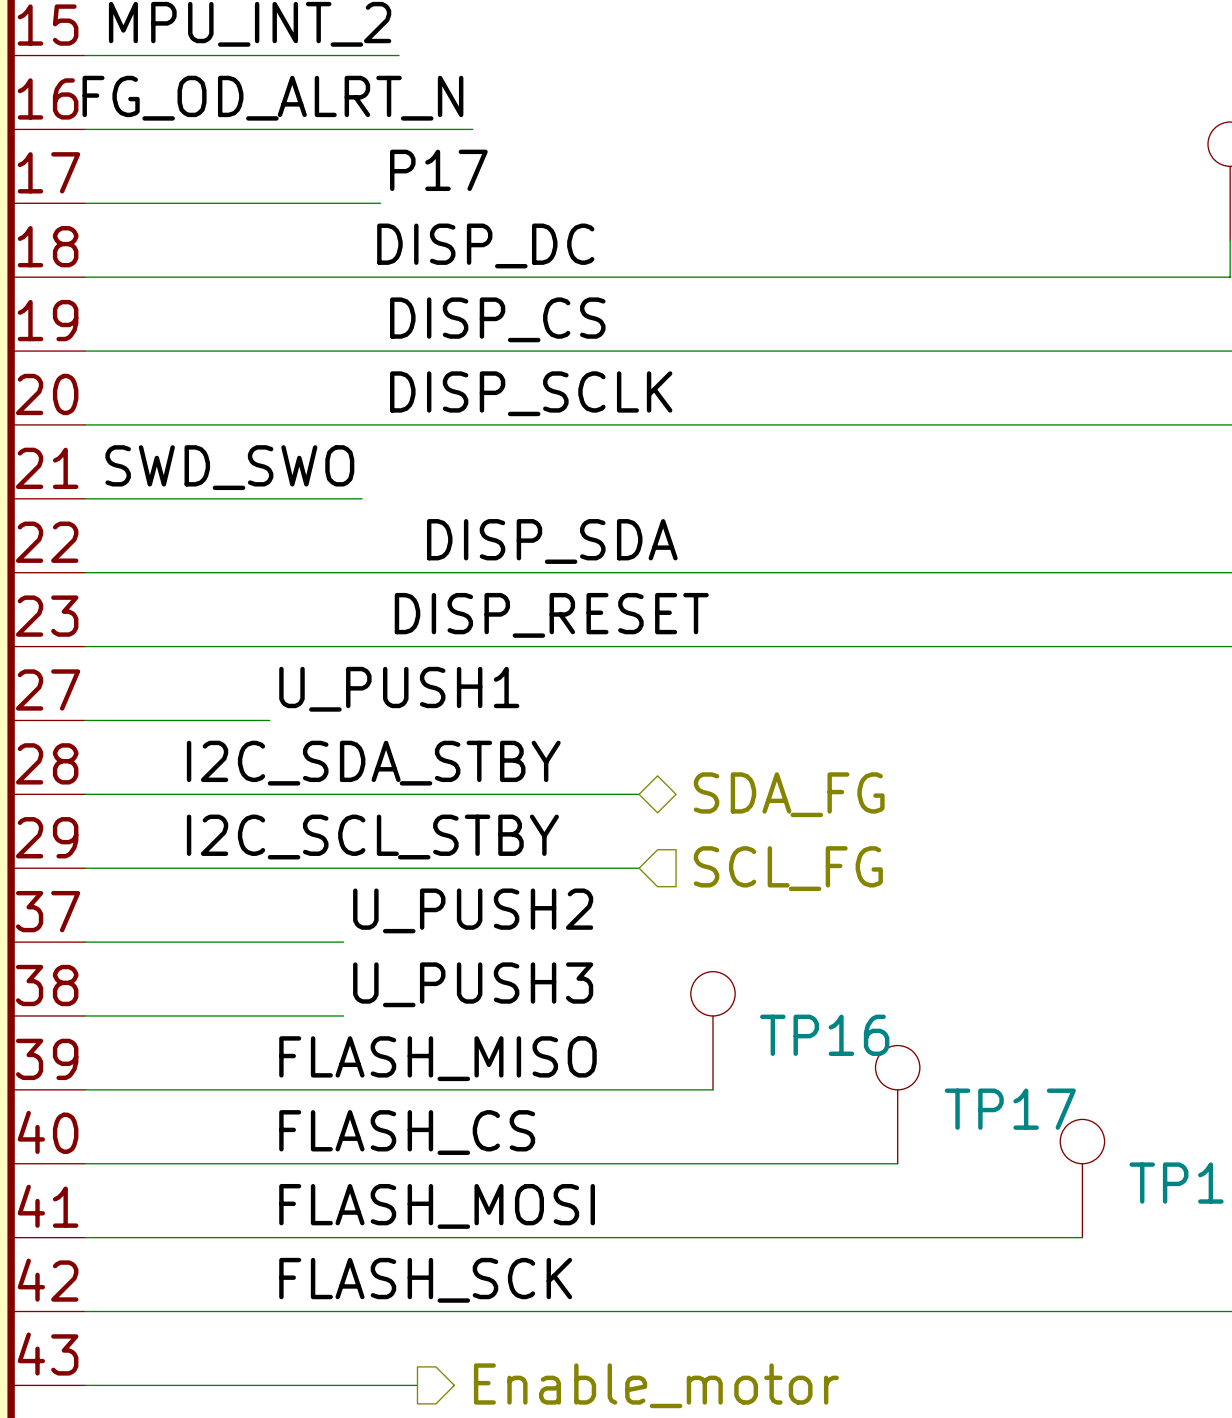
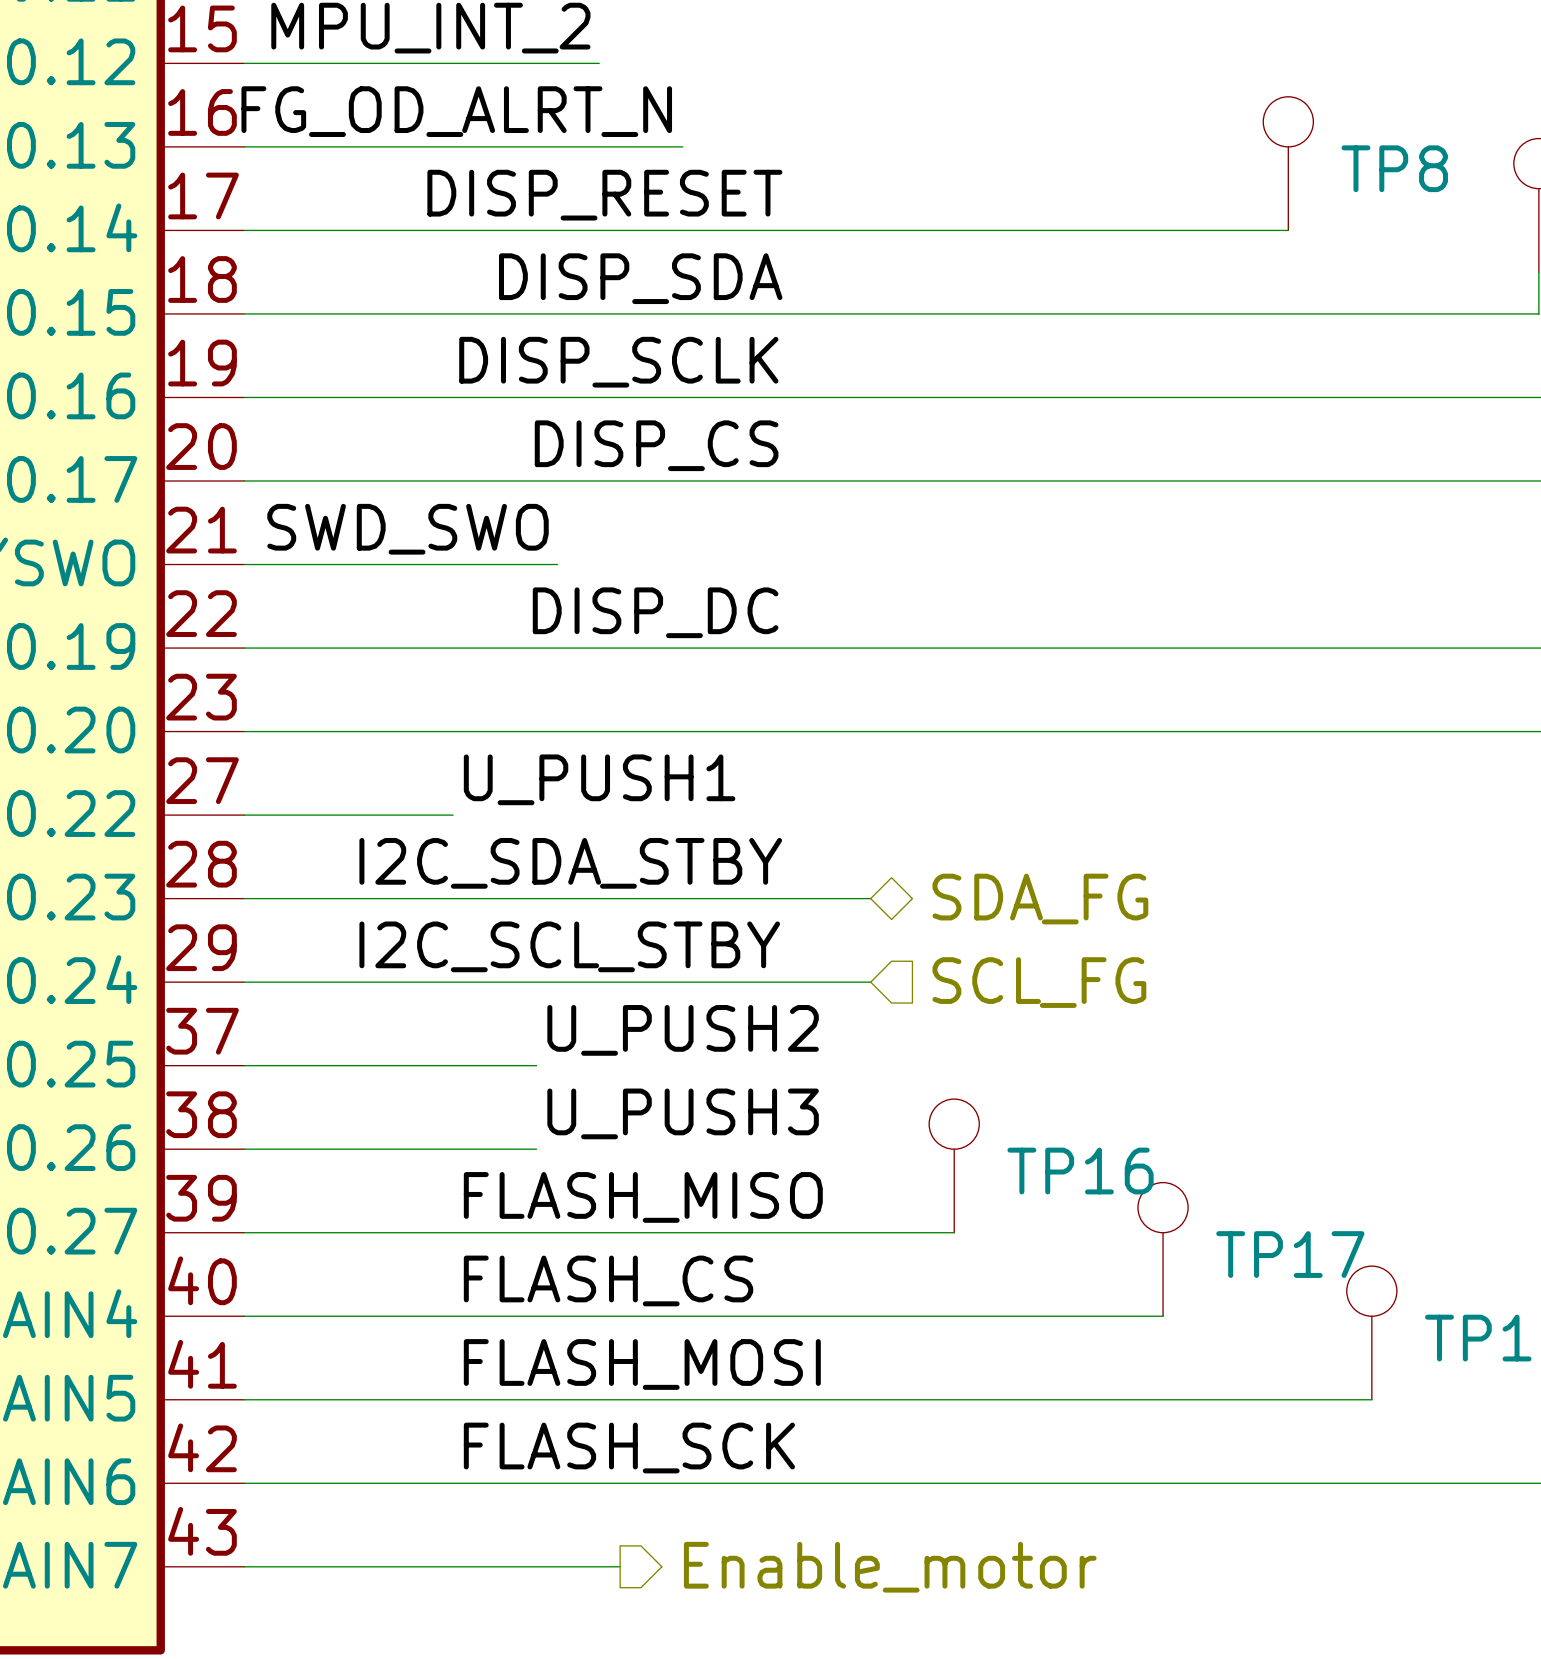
TP8: none -> (1288, 163)
label: P17 (438, 170) -> none
wire: none -> (578, 230) (1288, 230)
label position: DISP_DC (485, 245) -> DISP_DC (655, 612)
label position: DISP_CS (497, 319) -> DISP_CS (656, 445)
label position: DISP_SCLK (531, 393) -> DISP_SCLK (618, 362)
label position: DISP_SDA (552, 541) -> DISP_SDA (640, 278)
label position: DISP_RESET (551, 615) -> DISP_RESET (604, 195)

